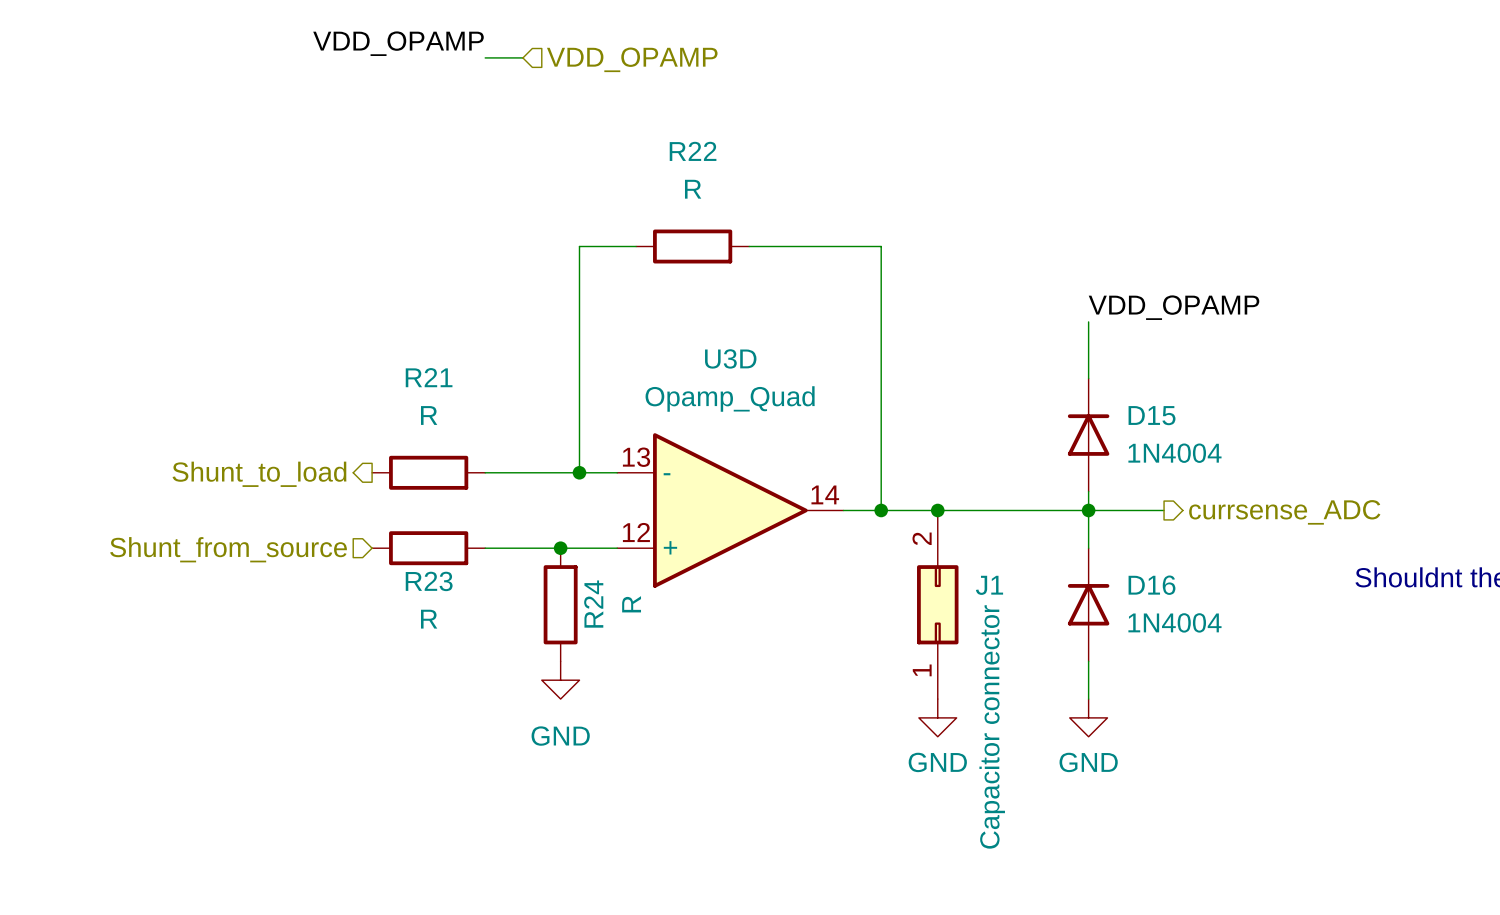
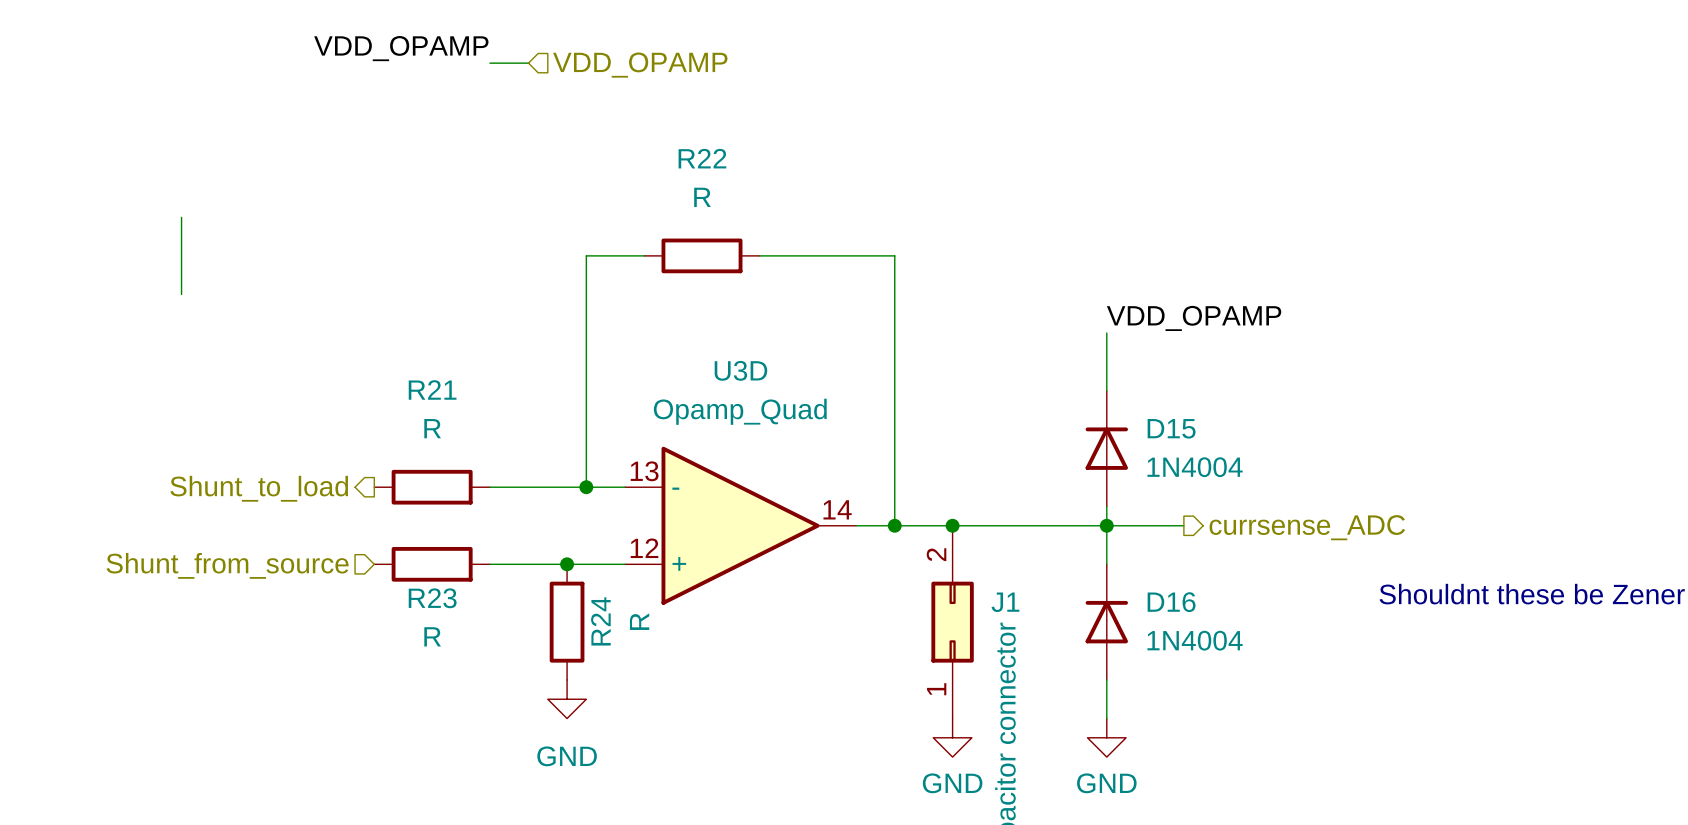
wire: none -> (181, 217) (181, 294)

